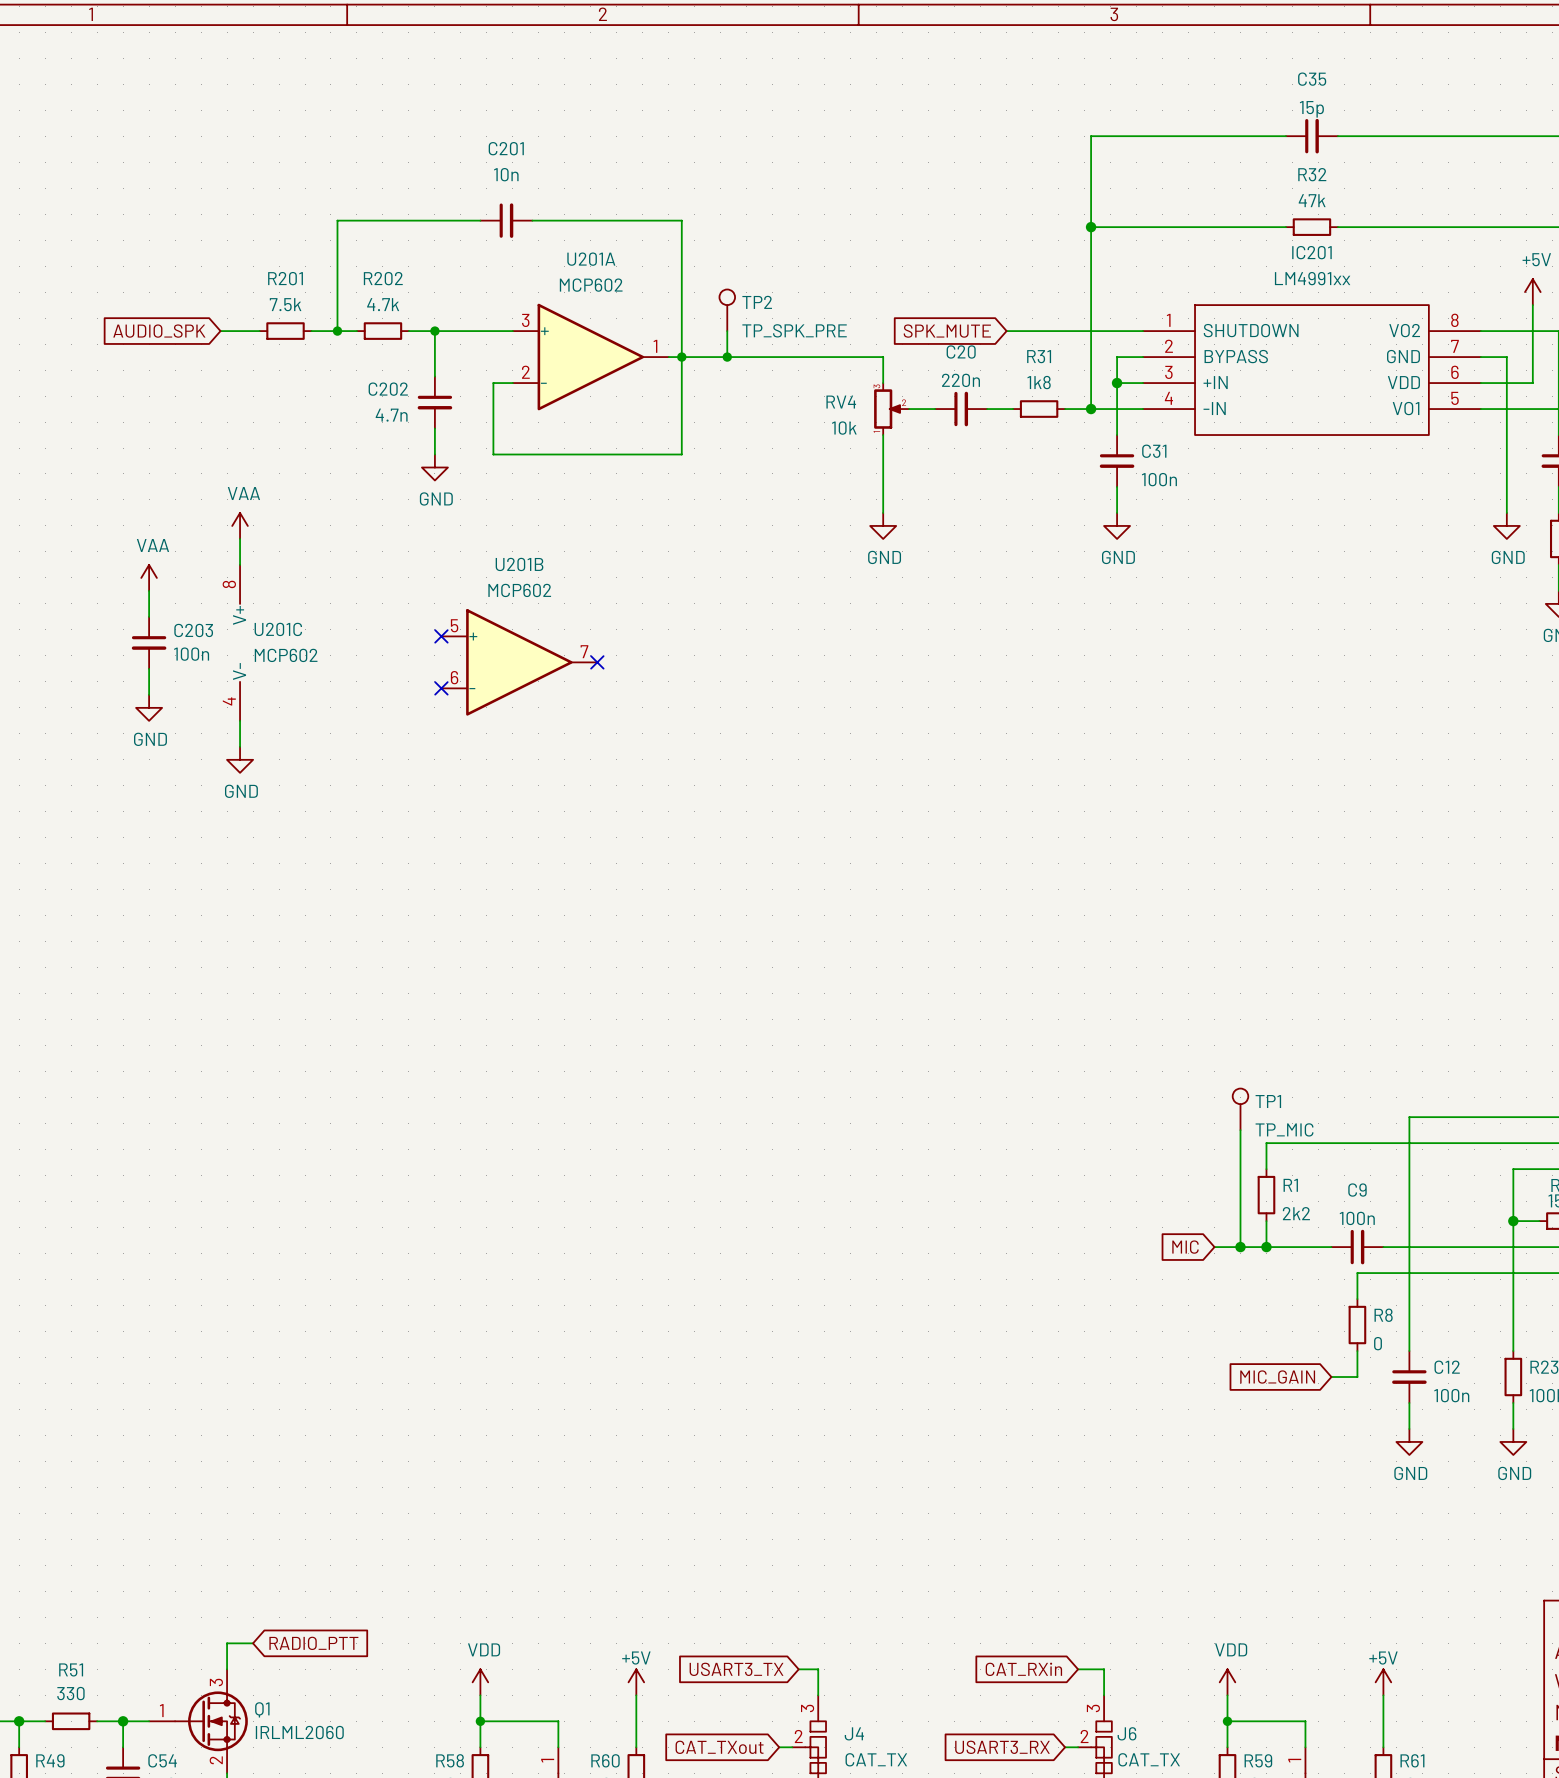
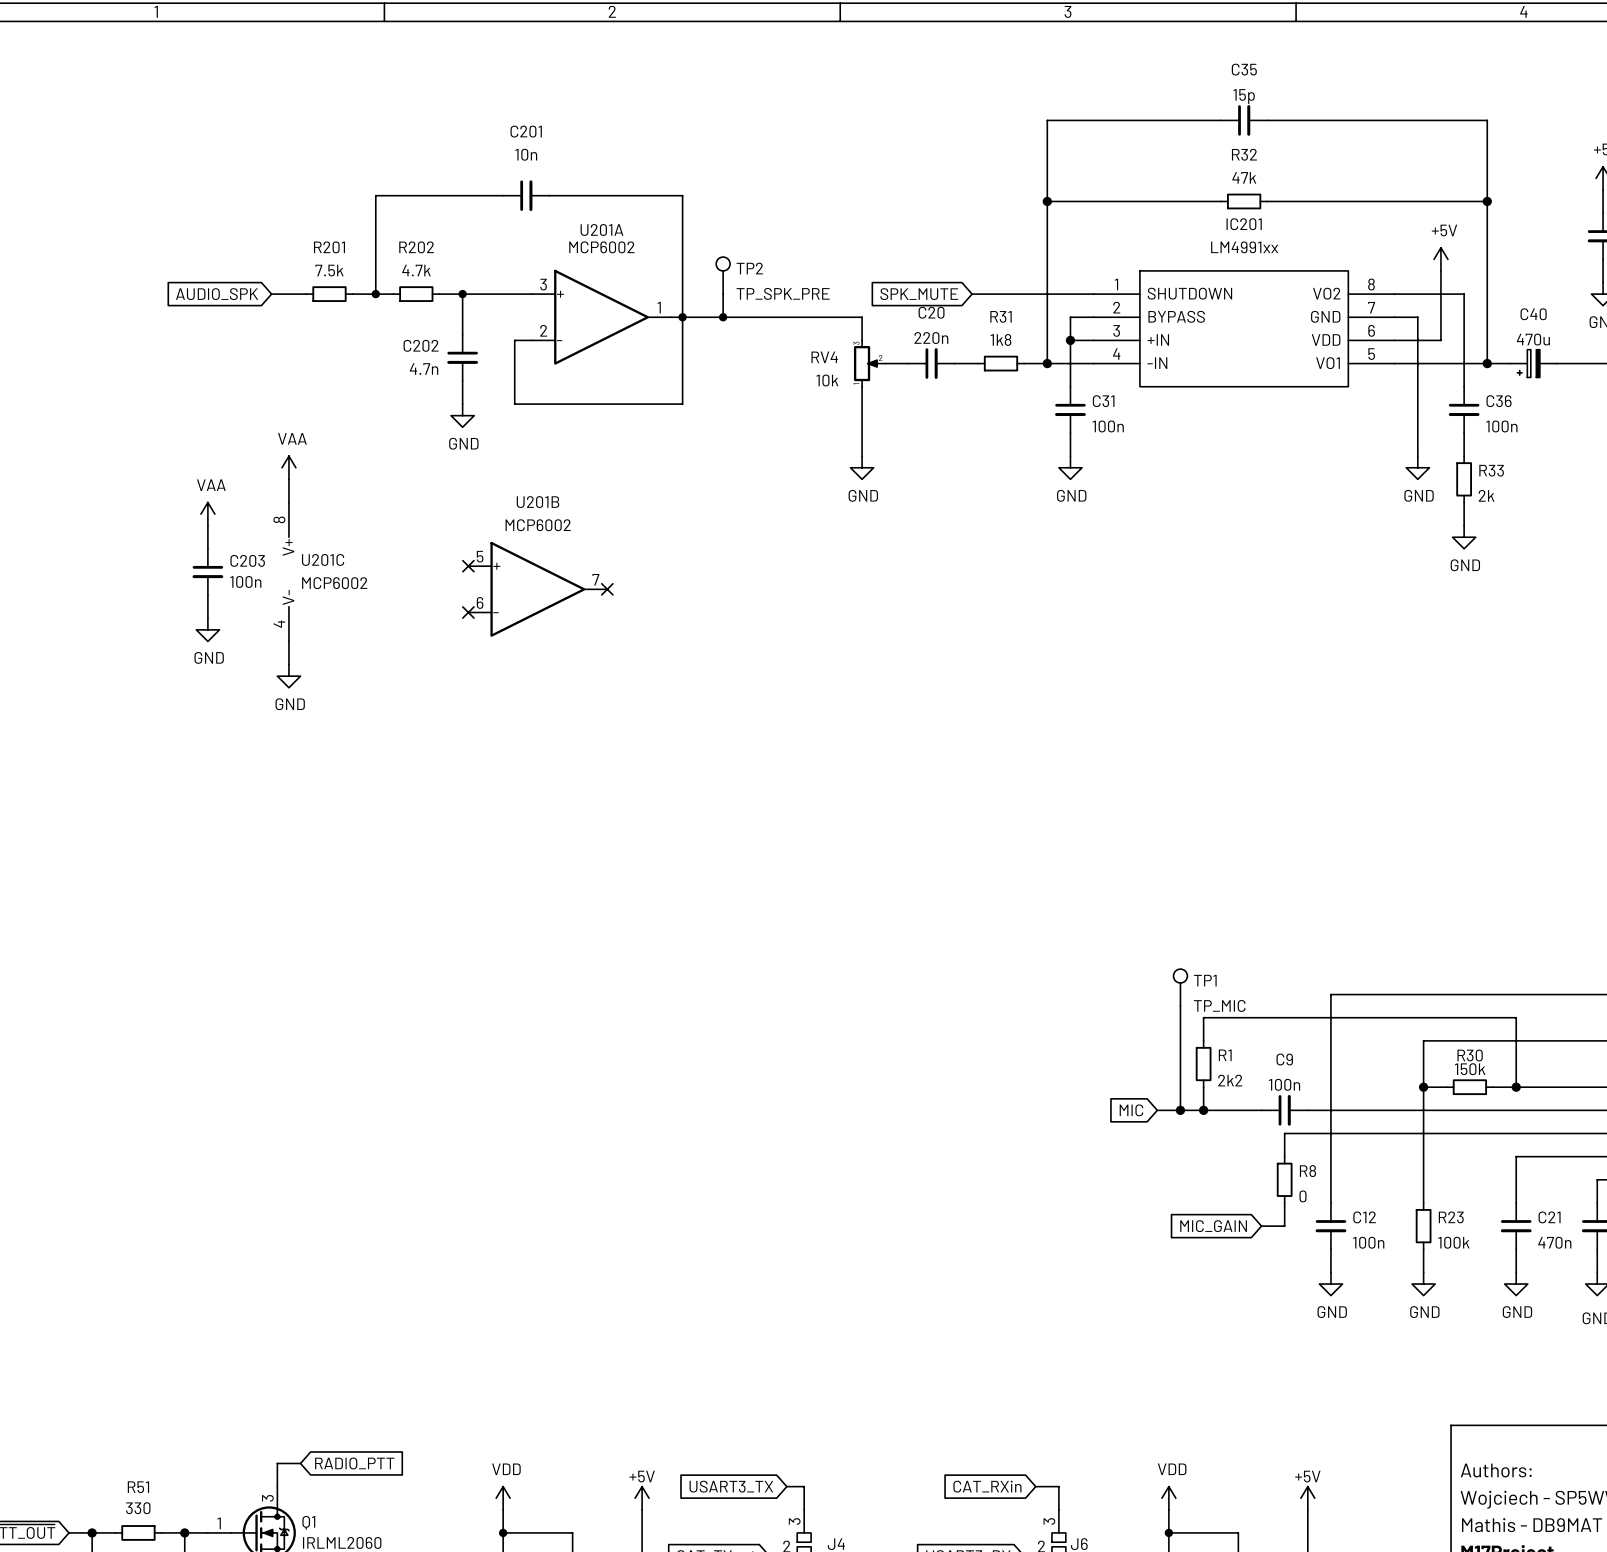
U201A value: MCP602 (591, 285) -> MCP6002 (601, 247)
U201B value: MCP602 (519, 590) -> MCP6002 (538, 525)
U201C value: MCP602 (286, 655) -> MCP6002 (334, 583)

